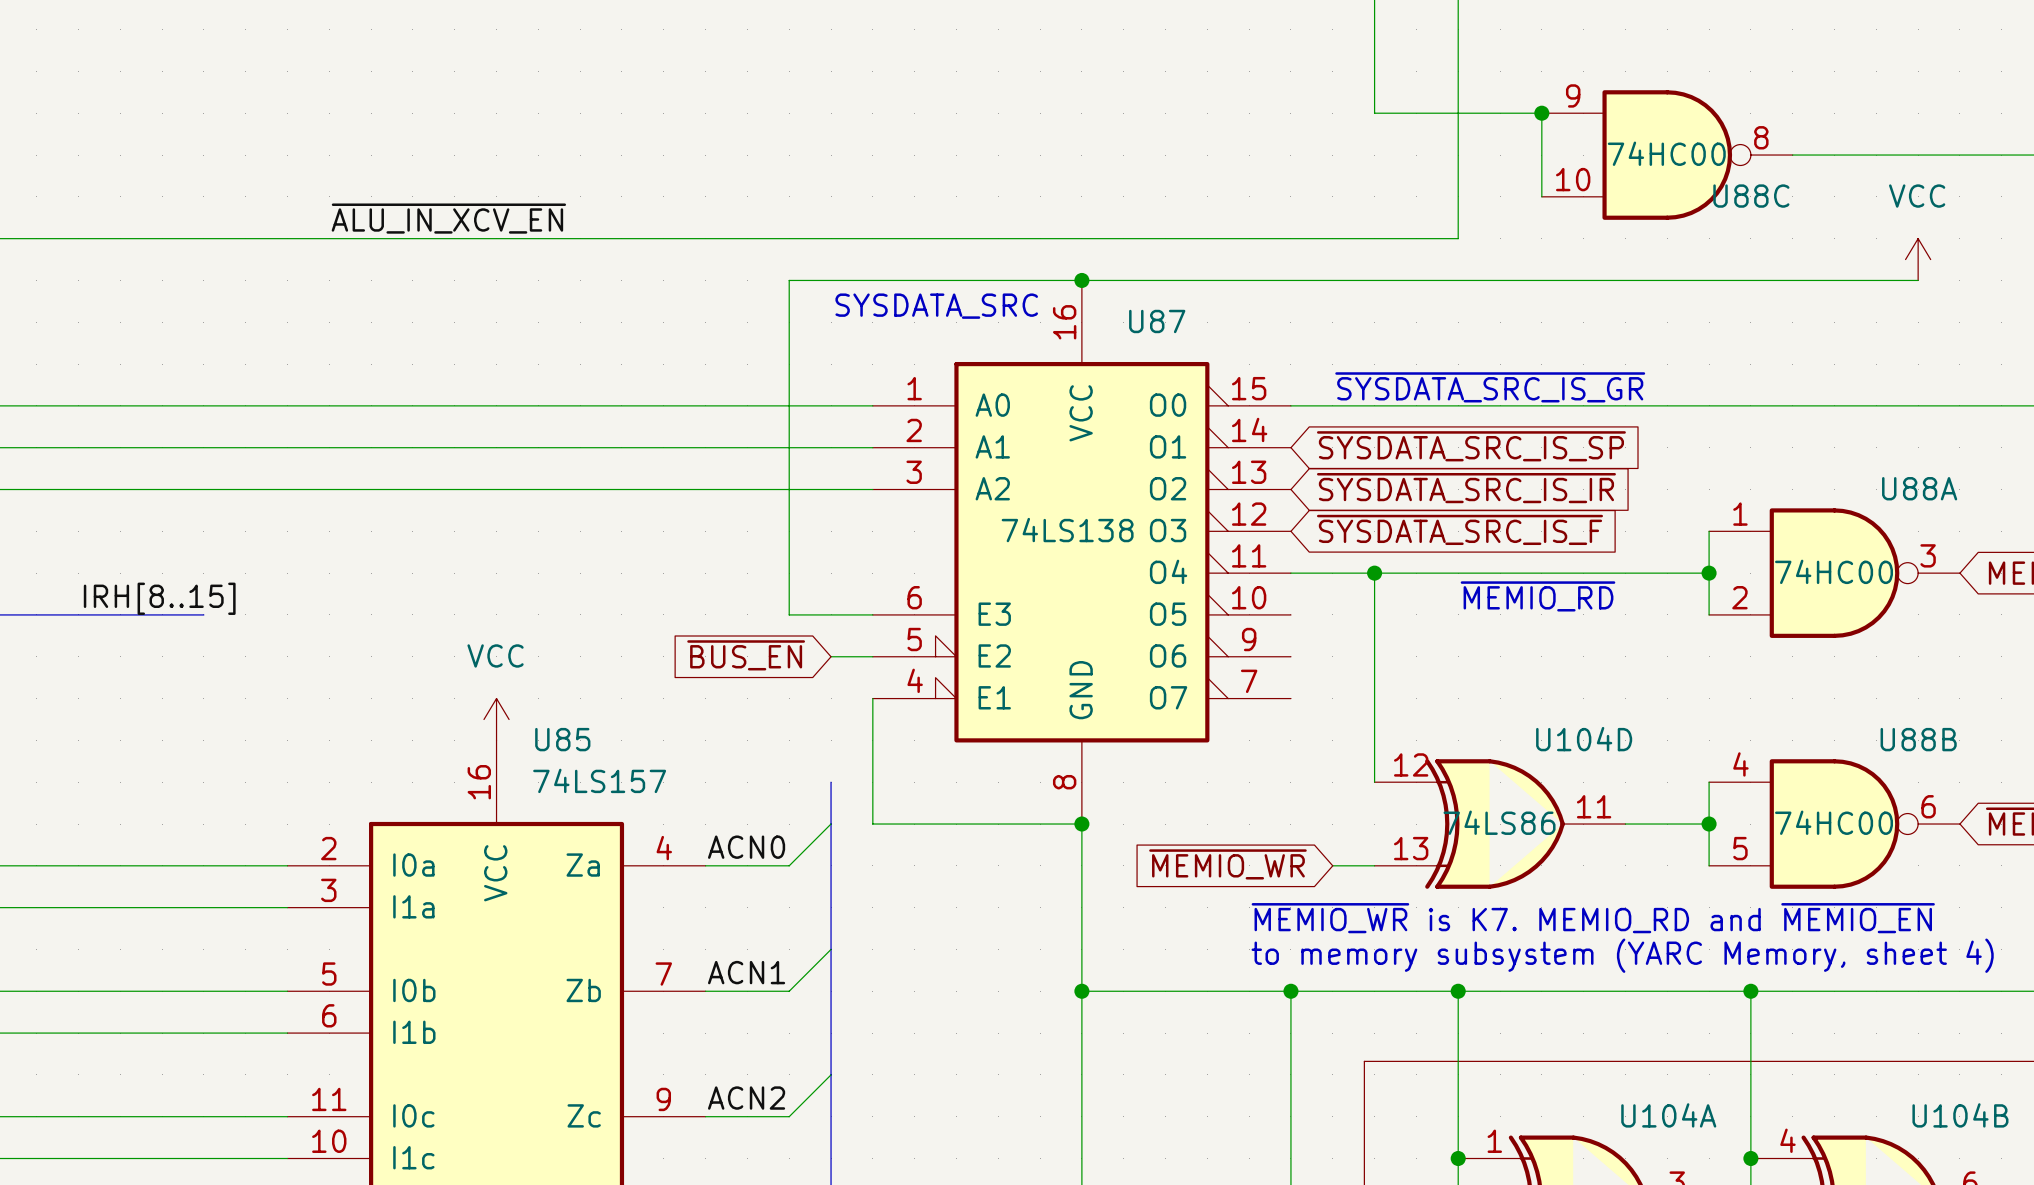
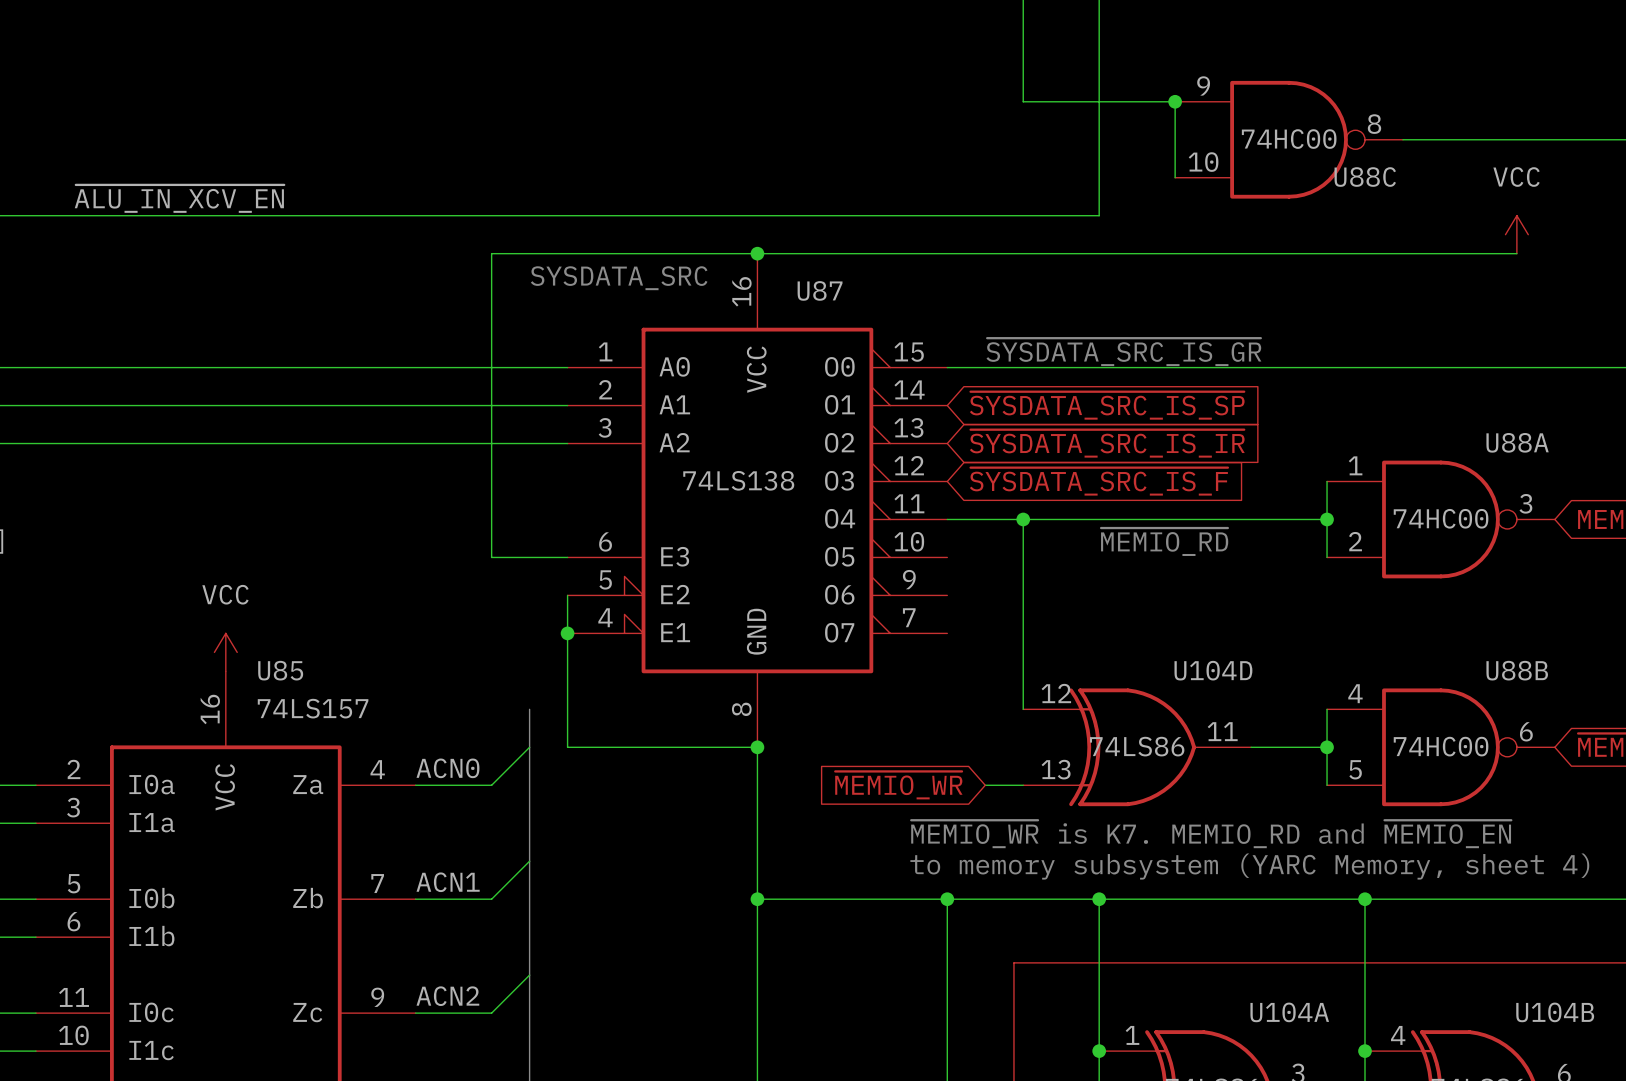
global label: ~{BUS_EN} (746, 655) -> none
wire: (831, 656) (872, 656) -> (567, 633) (567, 595)
junction: none -> (567, 633)

